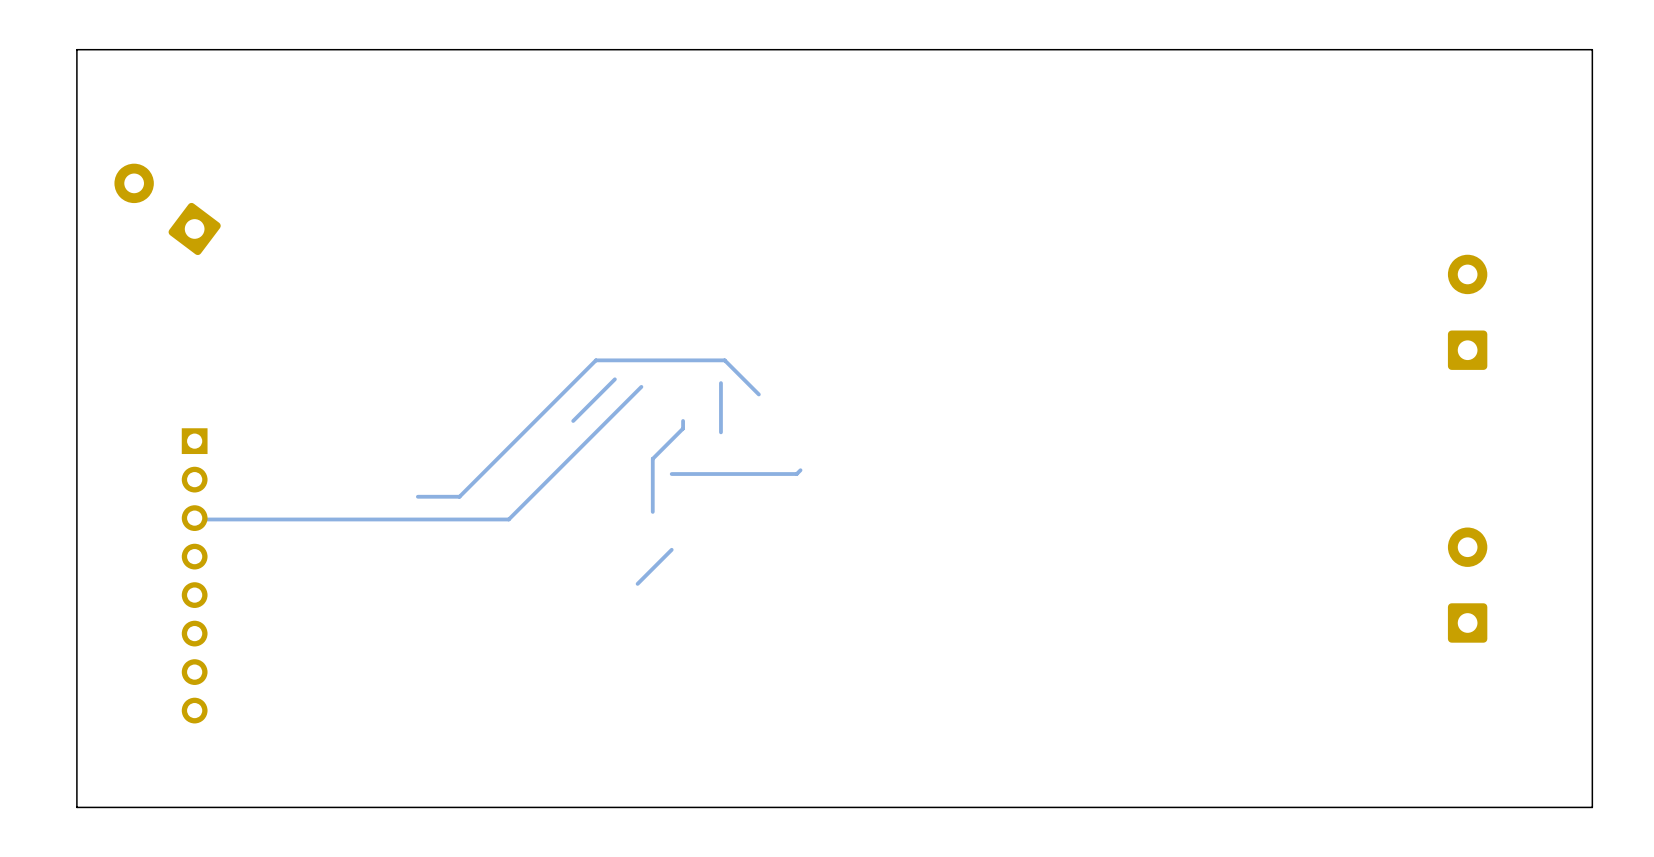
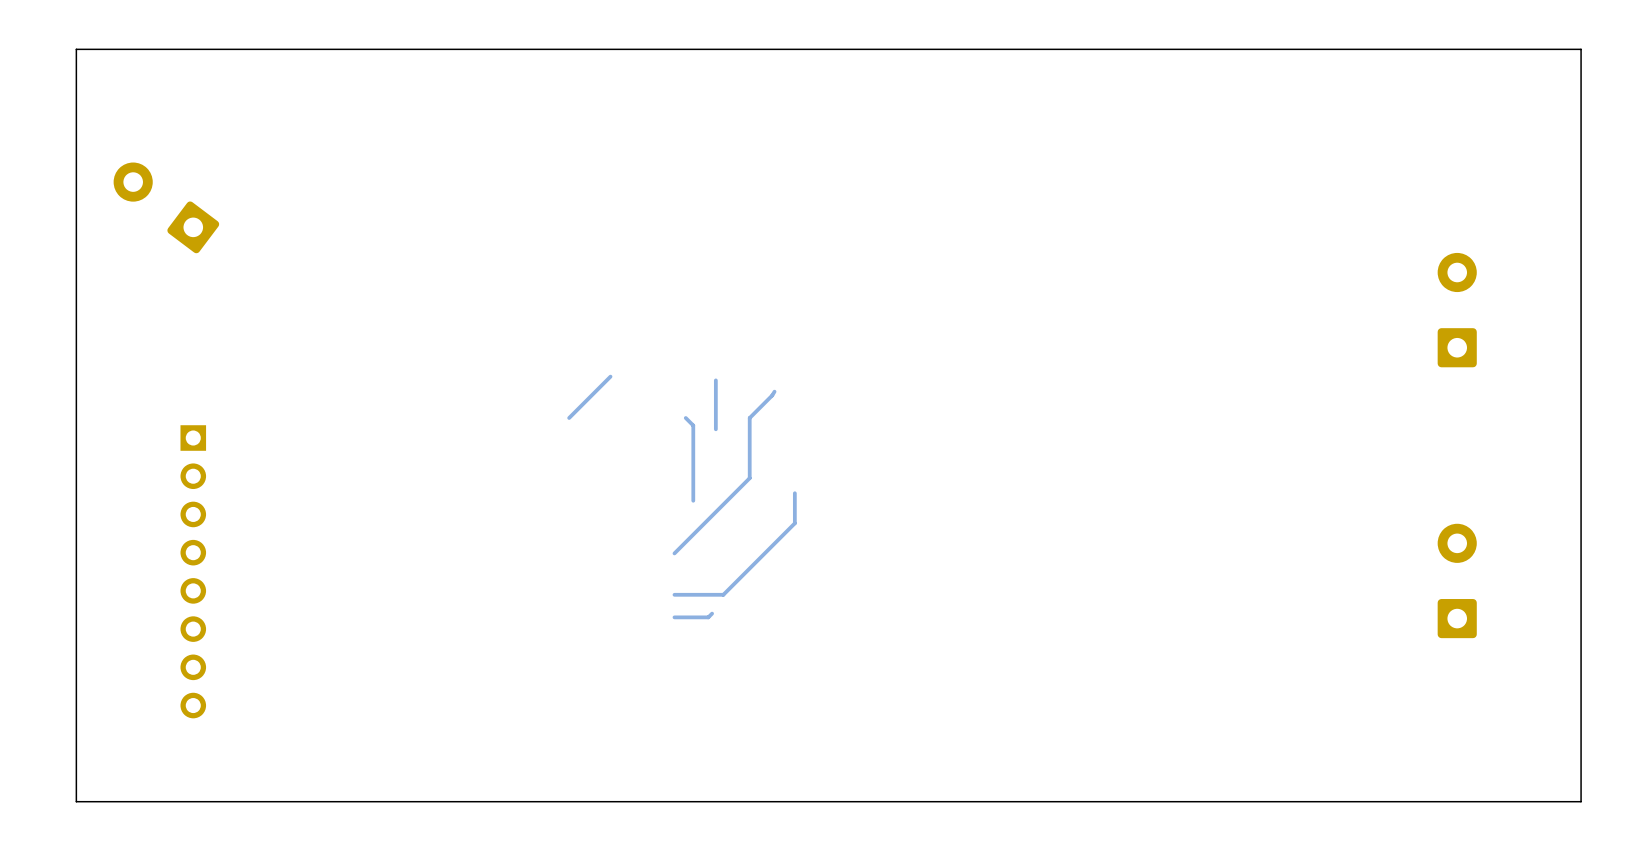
track: (641, 386) (508, 519) (198, 520) -> none
track: (758, 394) (724, 360) (595, 360) (459, 496) (417, 496) -> none
track: none -> (774, 391) (749, 418) (749, 478) (674, 553)
track: (683, 420) (683, 428) (652, 458) (652, 511) -> none
track: none -> (685, 418) (693, 425) (693, 500)
track: (800, 470) (796, 474) (671, 474) -> none
track: none -> (794, 493) (794, 523) (723, 594) (674, 594)
track: (671, 549) (637, 583) -> none
track: none -> (712, 613) (708, 617) (674, 617)

